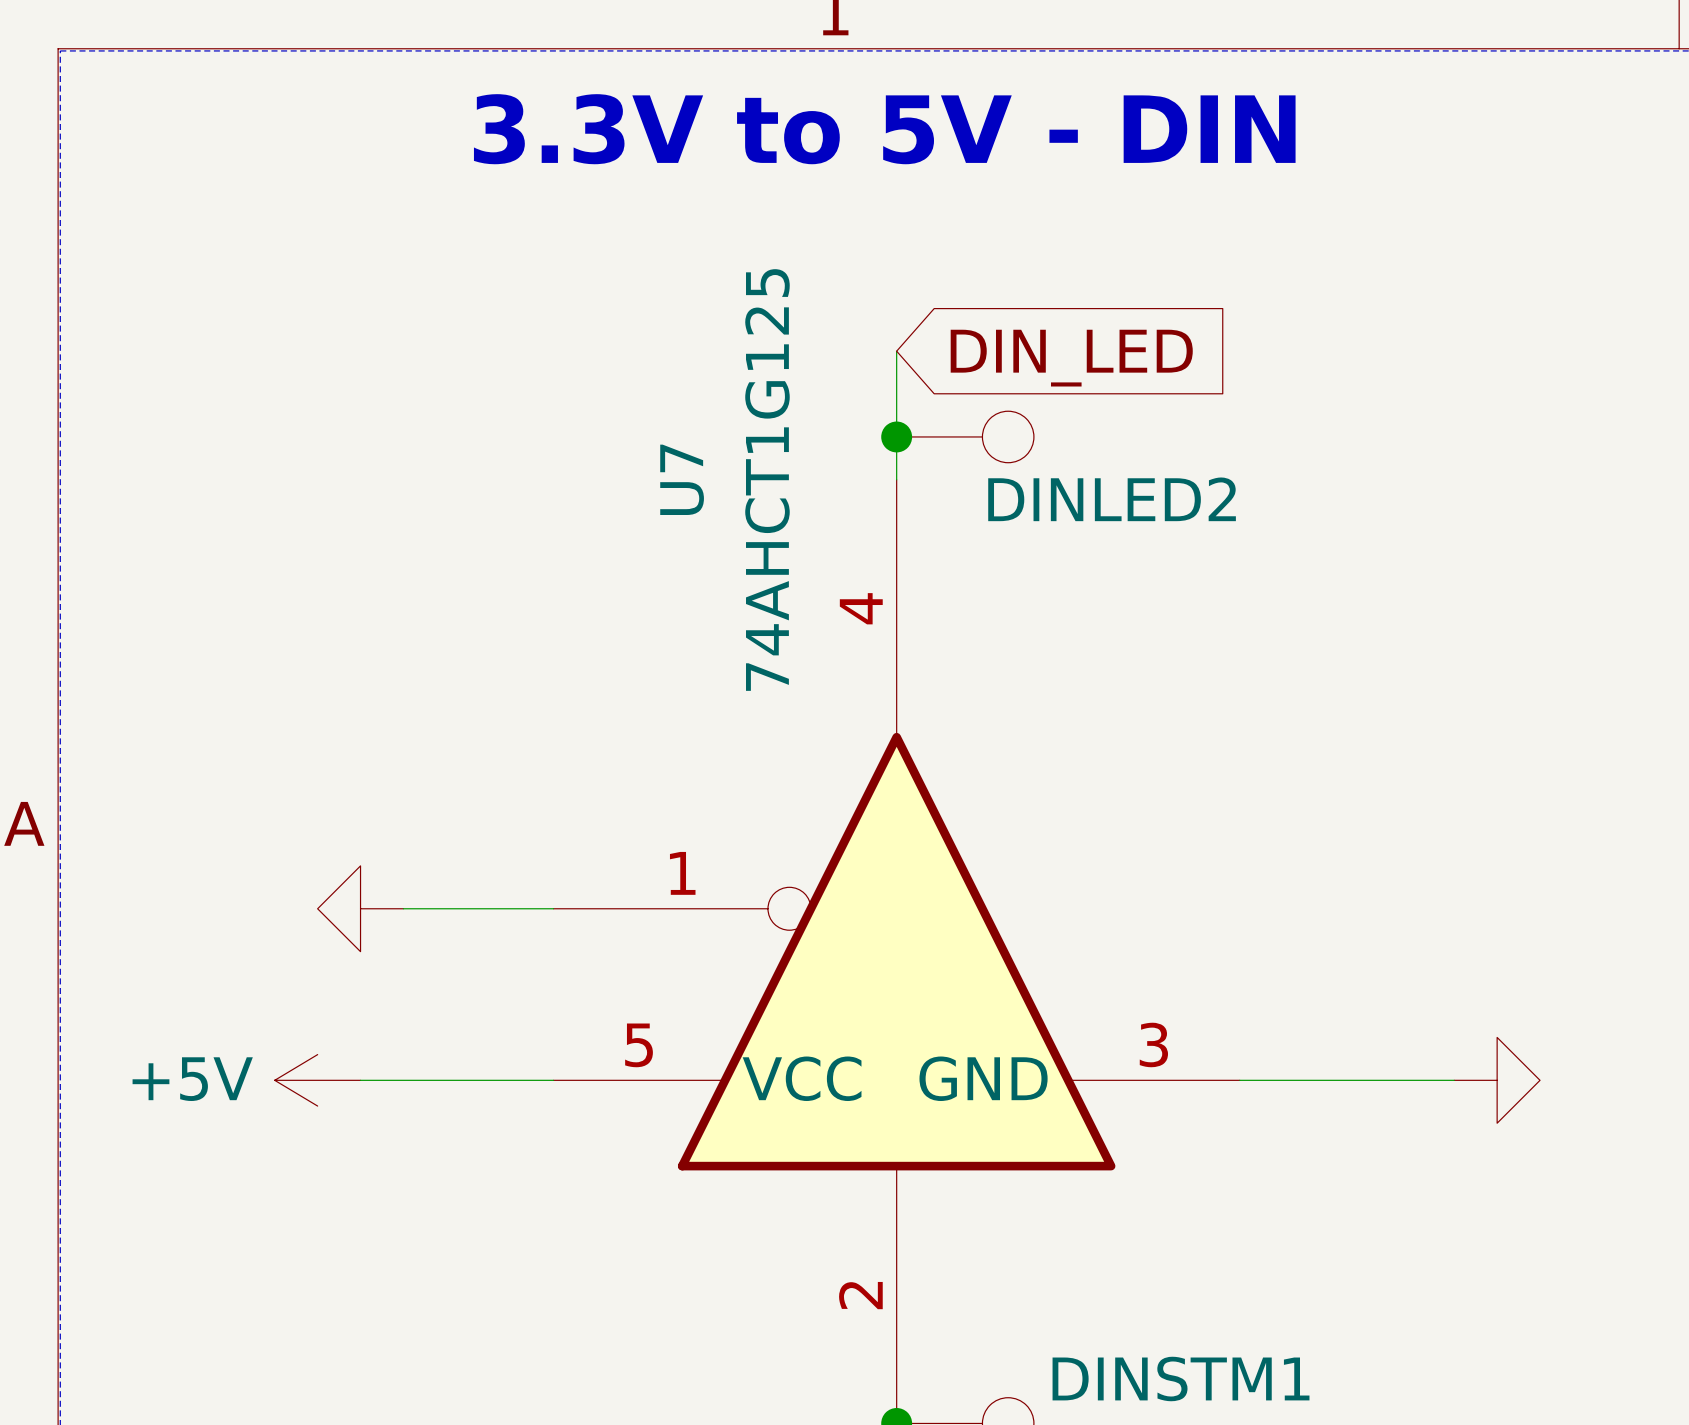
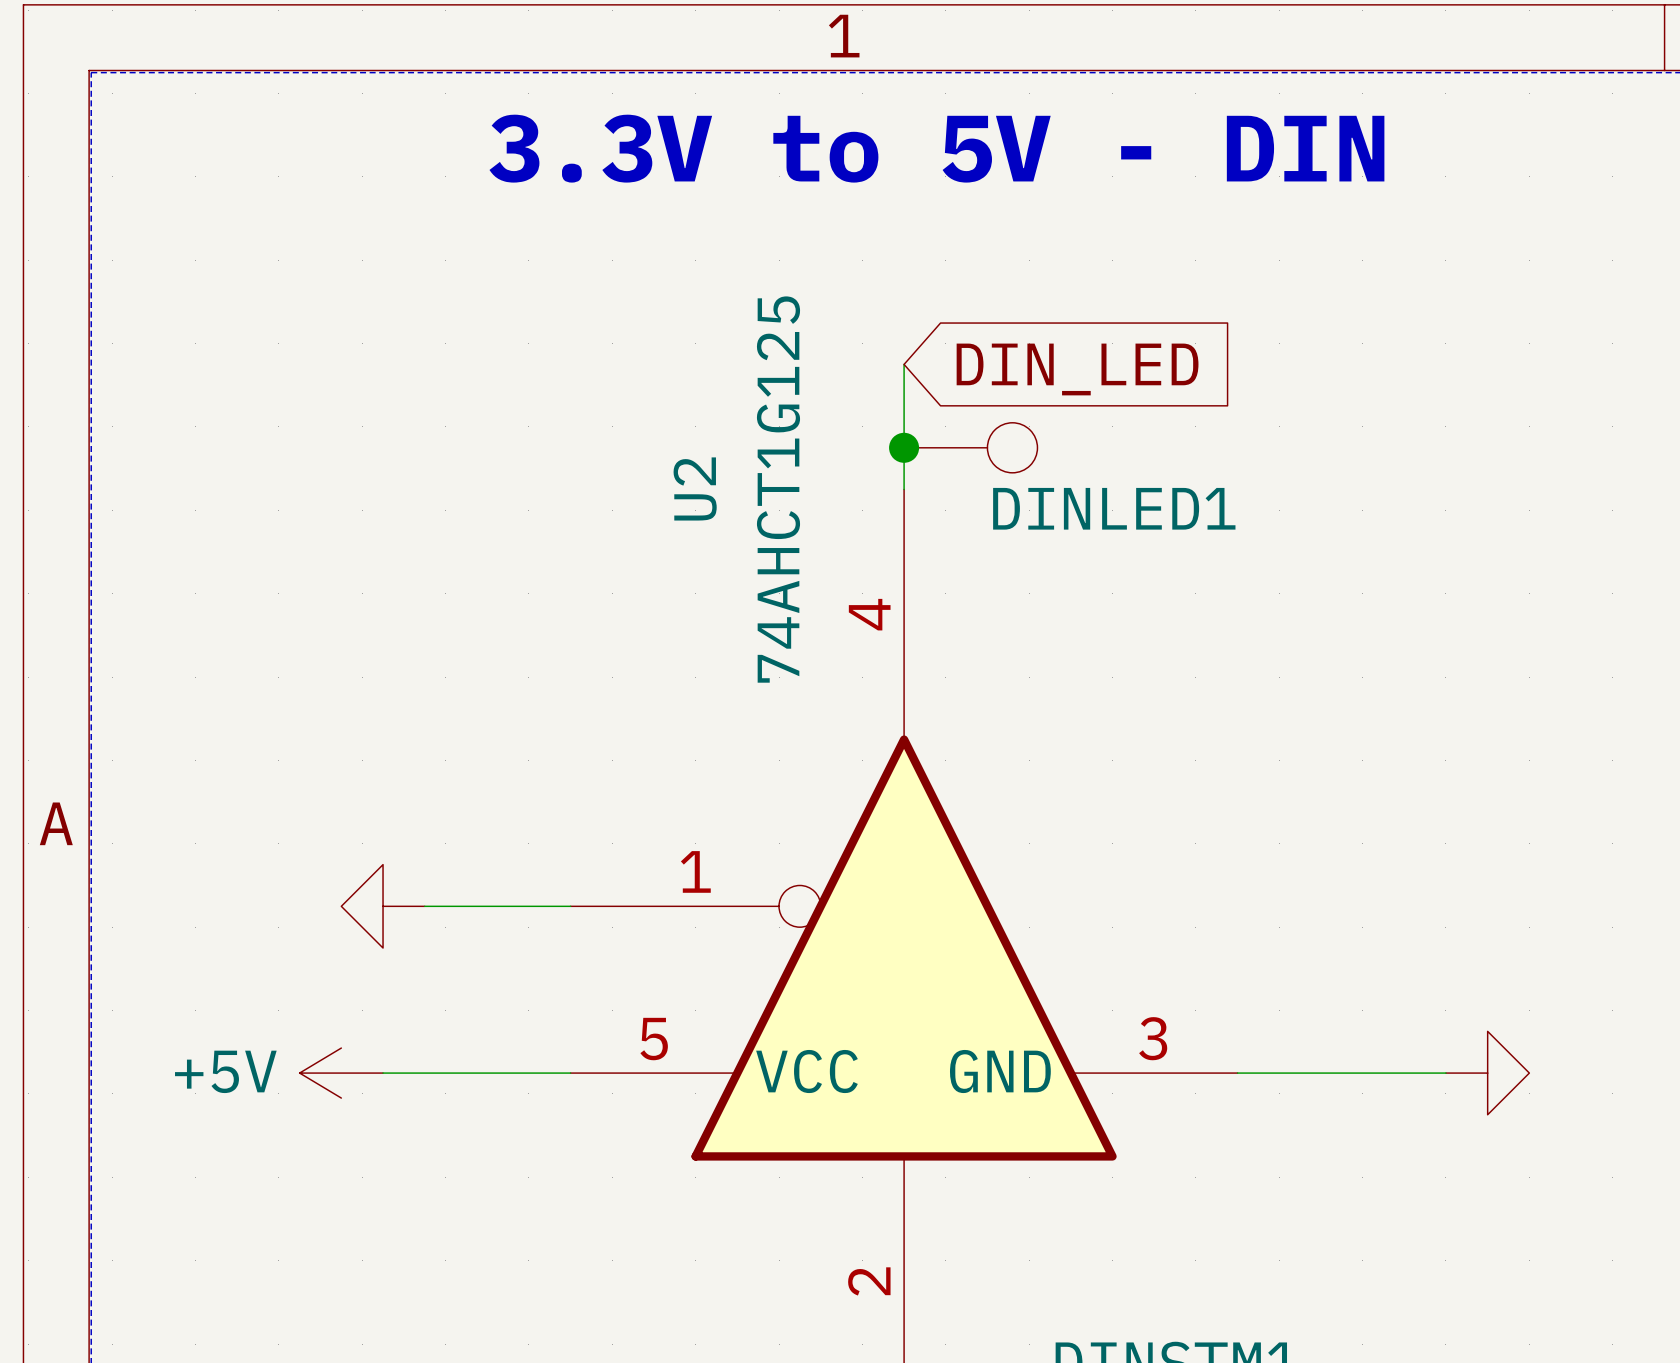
U7 name: U7 (682, 479) -> U2 (695, 488)
DINLED2 name: DINLED2 (1112, 499) -> DINLED1 (1114, 508)

